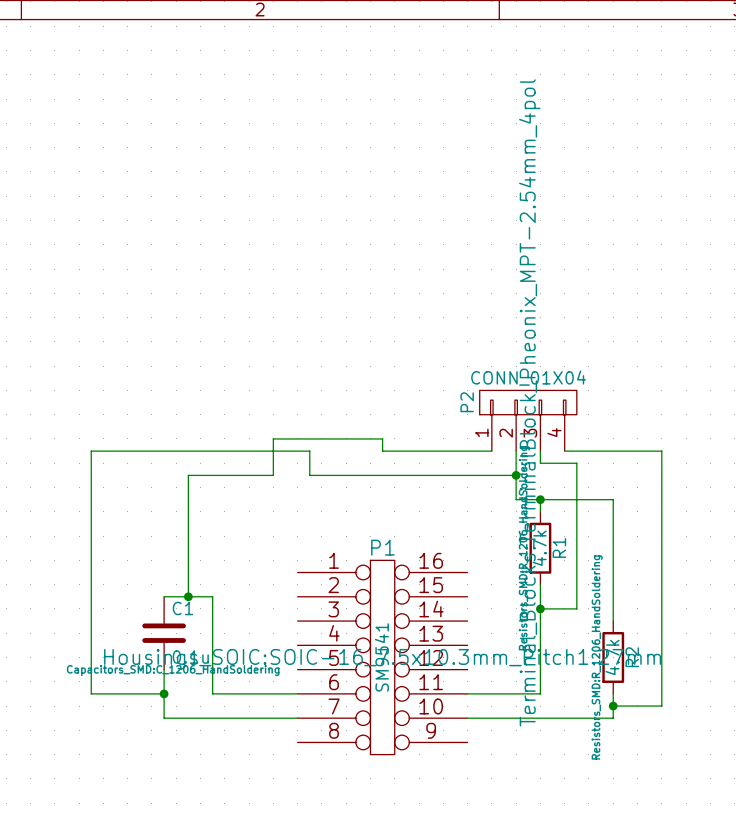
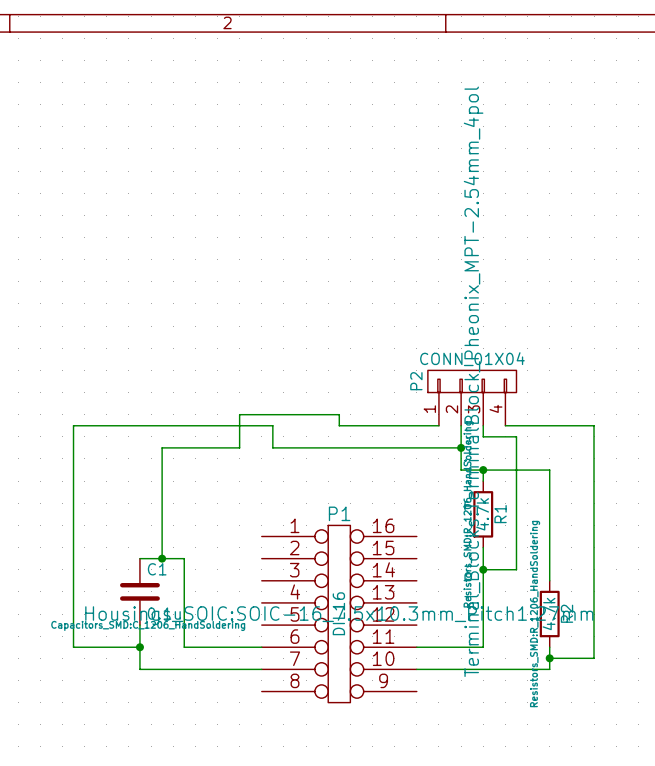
P1 value: SM9541 (381, 657) -> DIL16 (338, 613)

